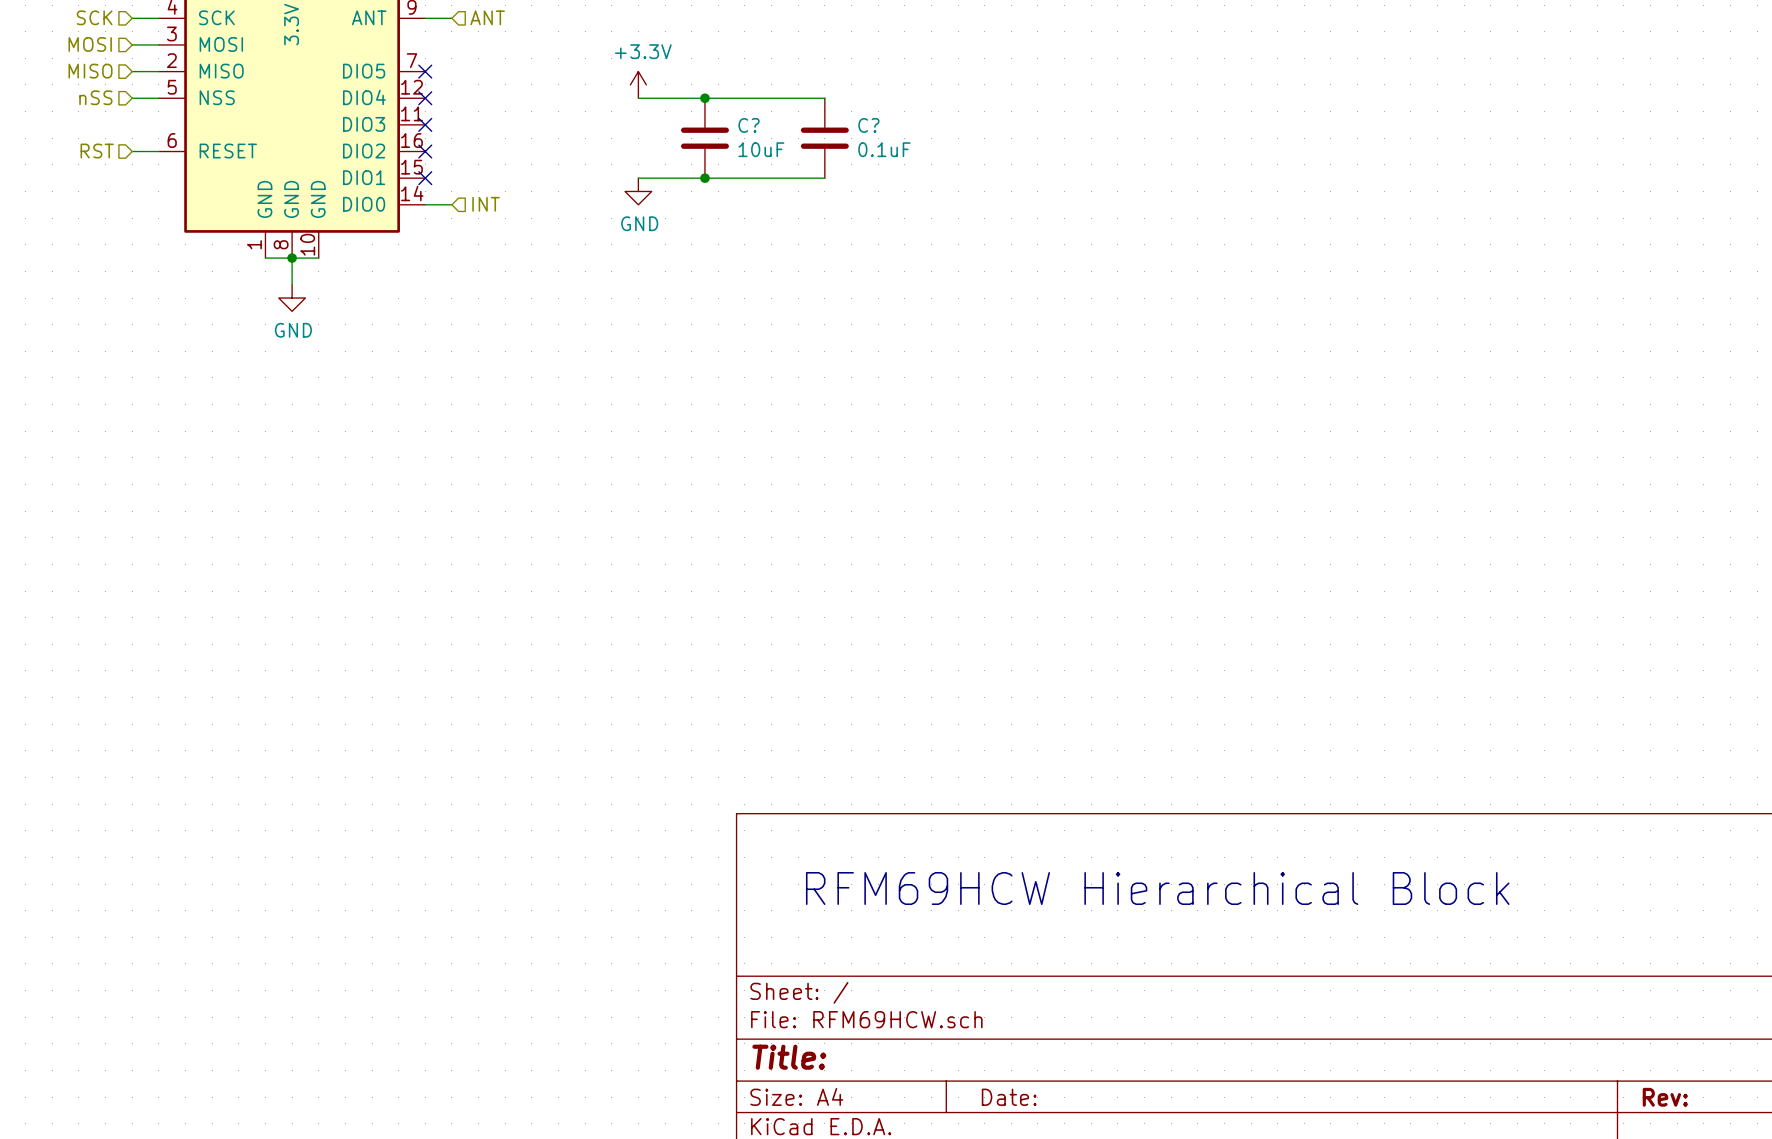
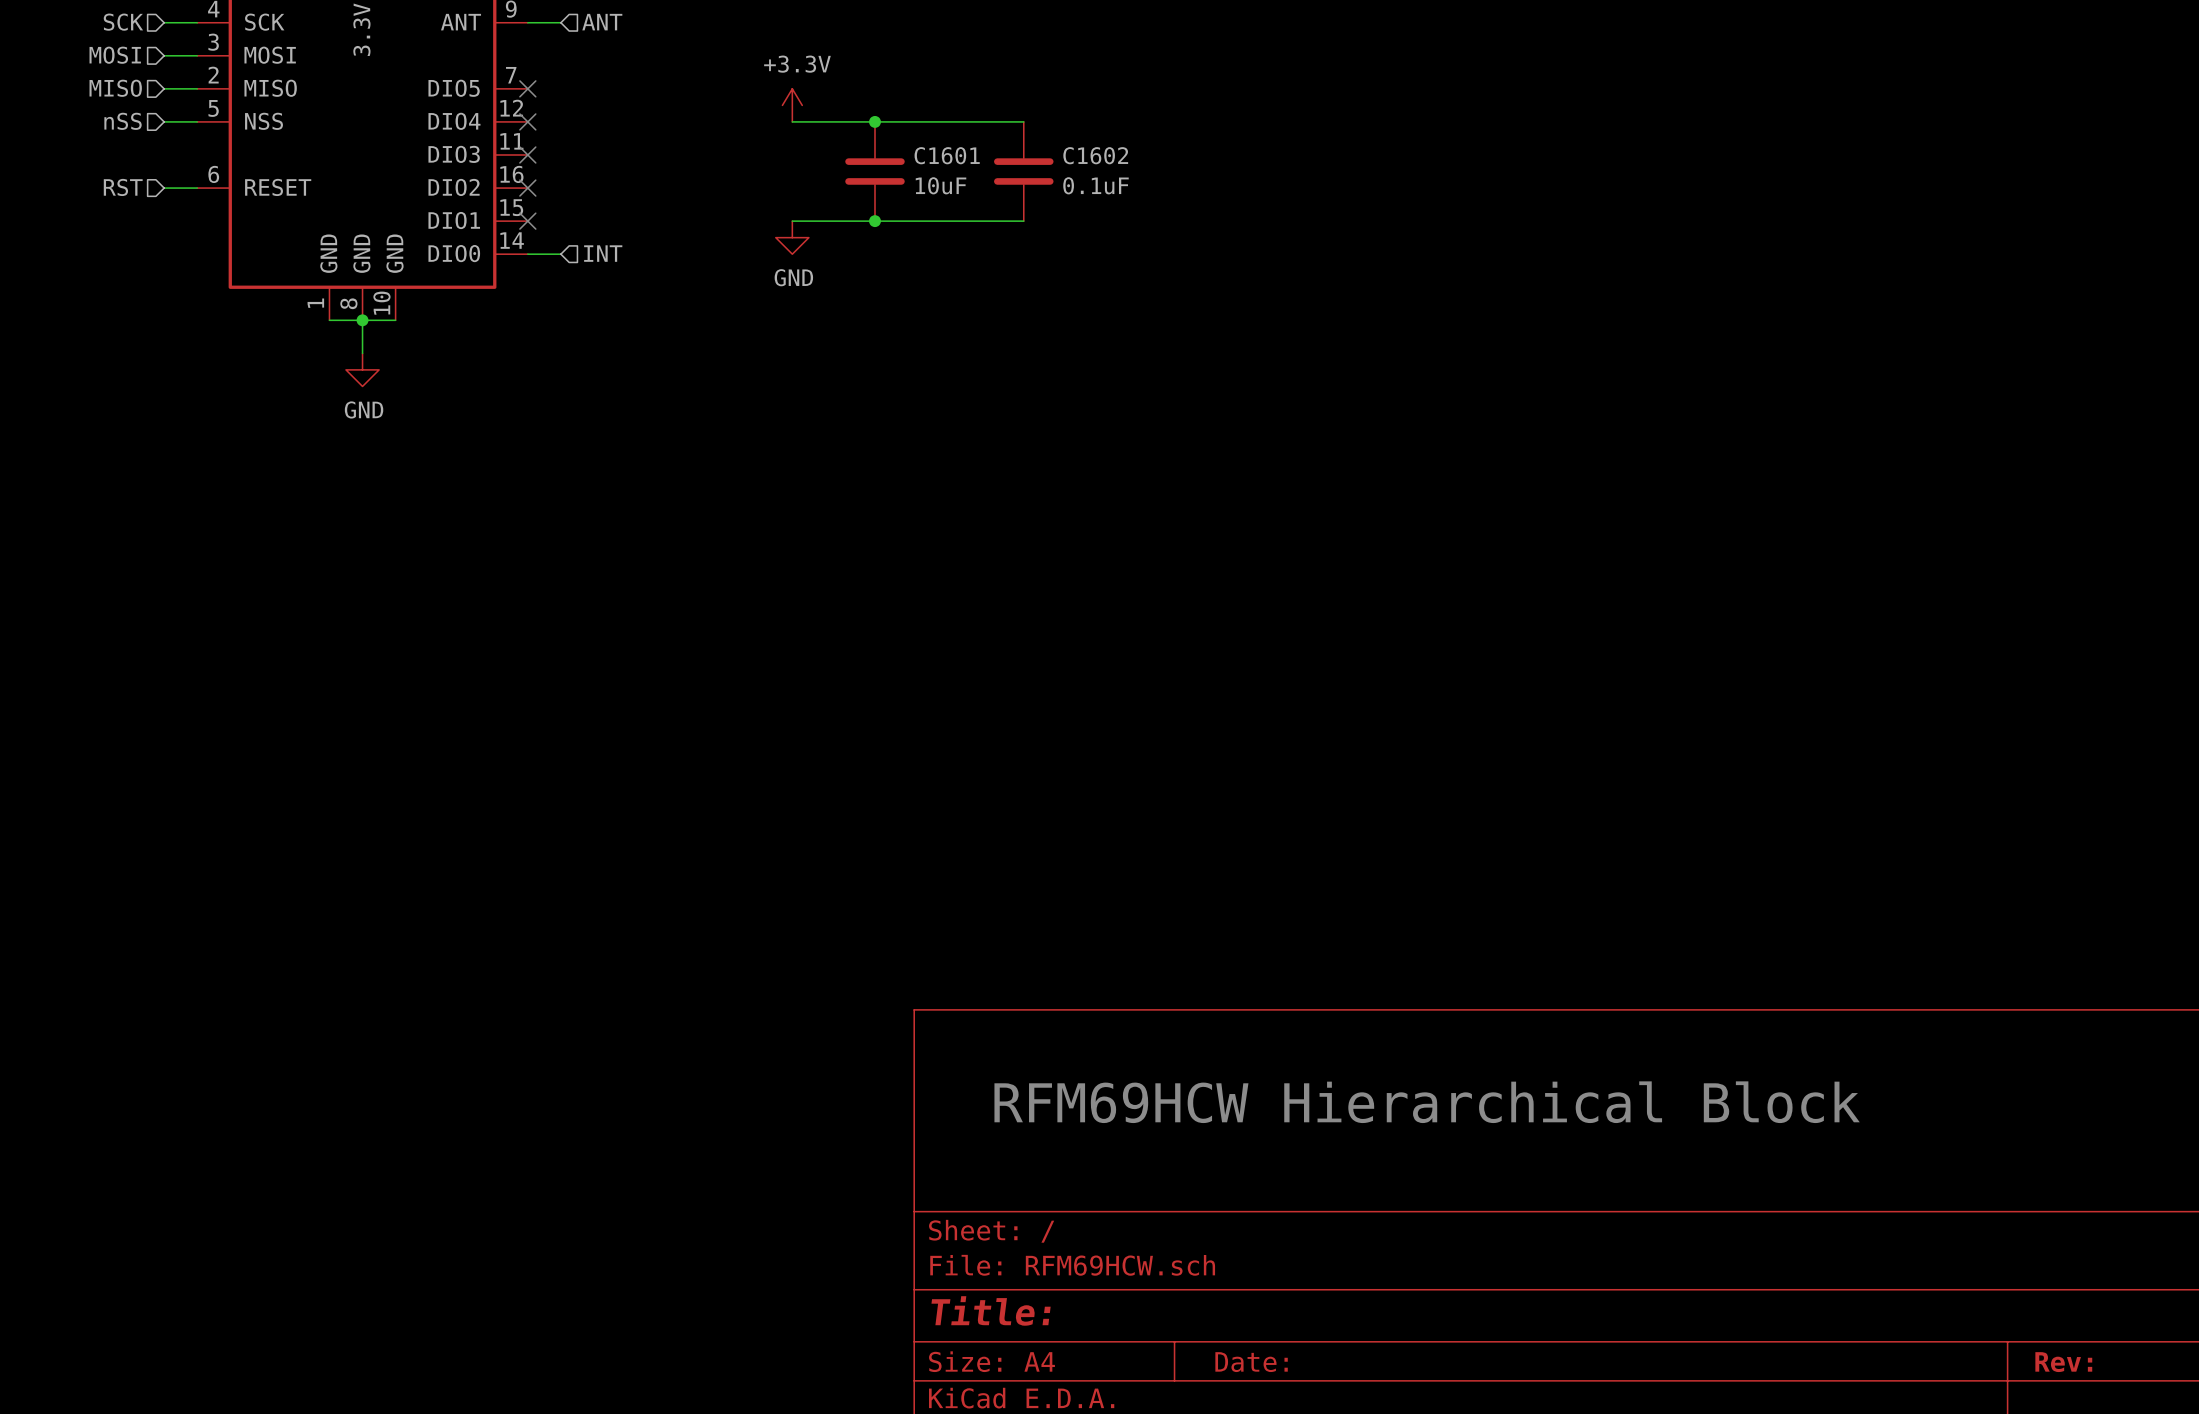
C? name: C? (749, 125) -> C1601 (947, 155)
C? name: C? (868, 125) -> C1602 (1095, 155)

